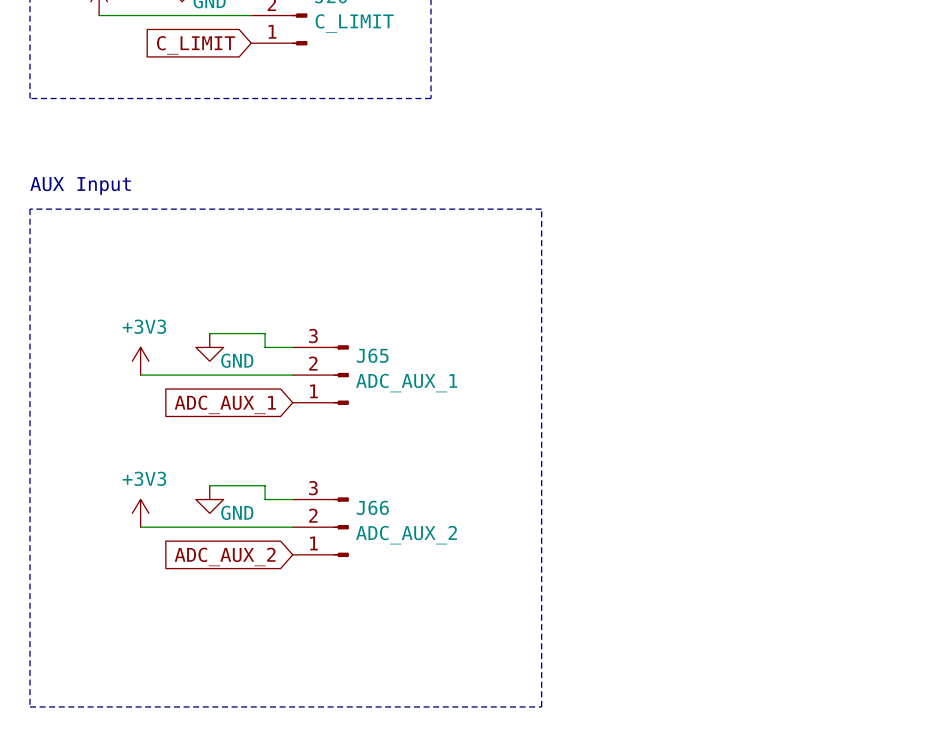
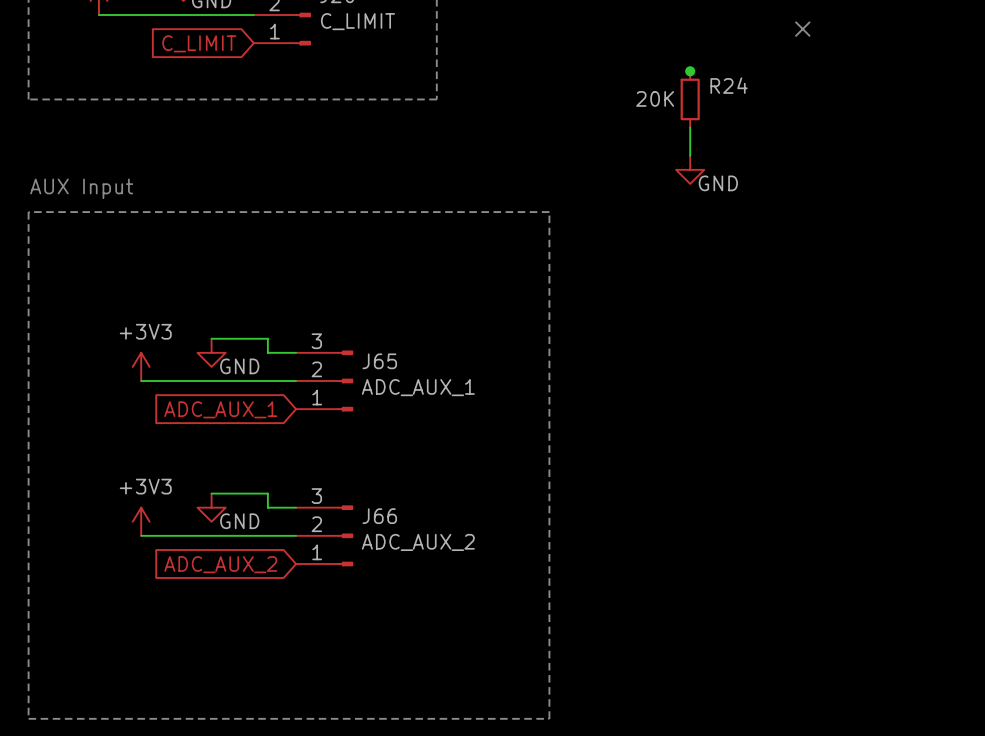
no-connect mark: none -> (802, 29)
junction: none -> (690, 71)
R24: none -> 20K (690, 99)
wire: none -> (690, 127) (690, 155)
power symbol: none -> GND (690, 169)

